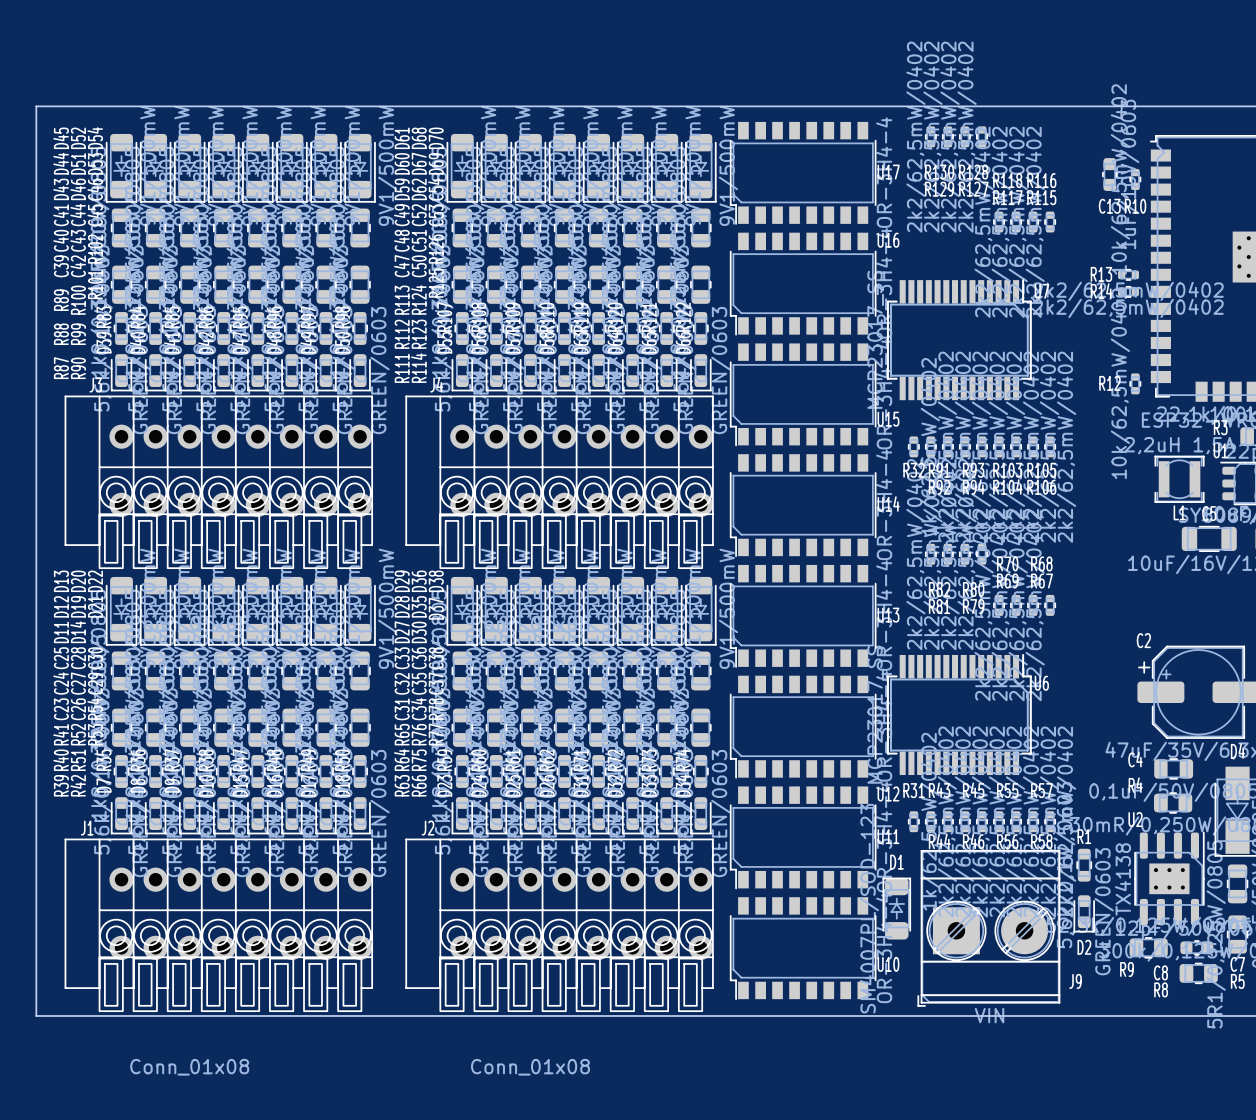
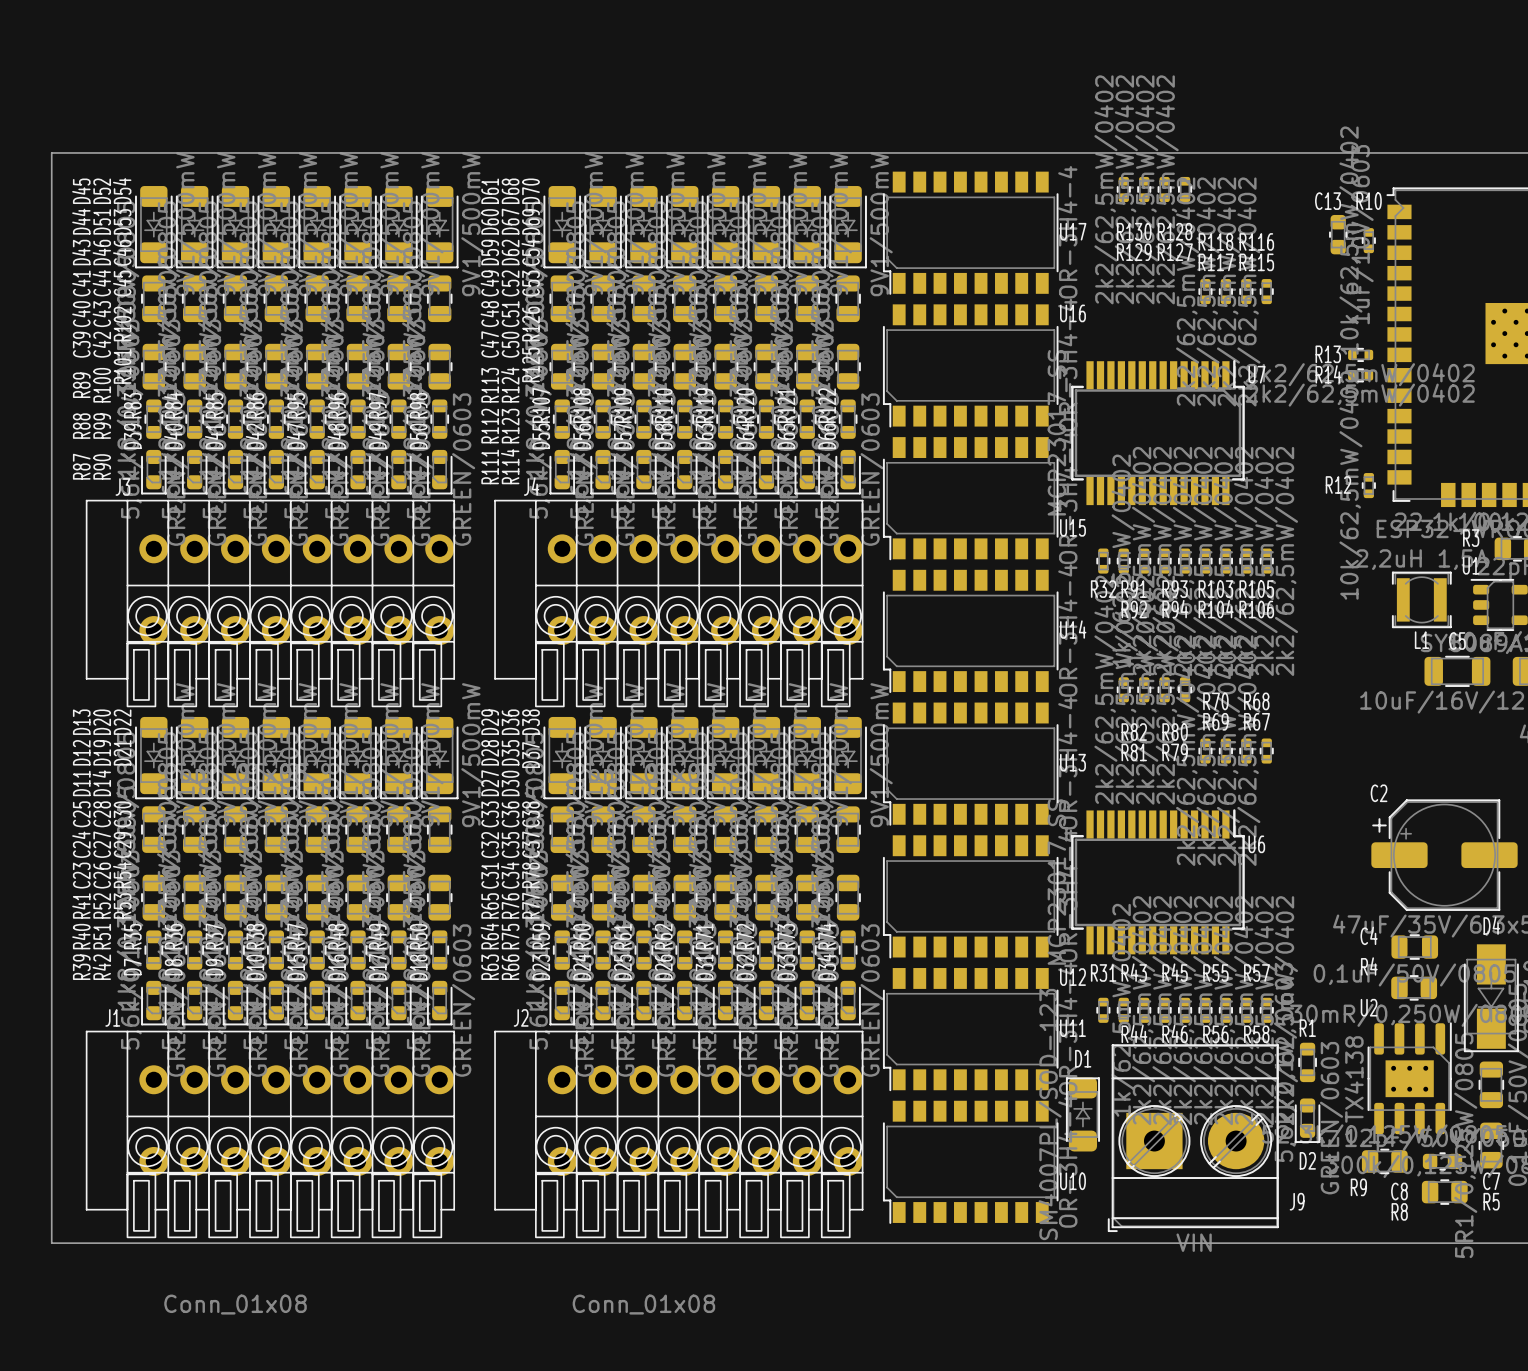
C13 name position: C13 (1109, 206) -> C13 (1328, 201)
R10 name position: R10 (1135, 206) -> R10 (1369, 201)

